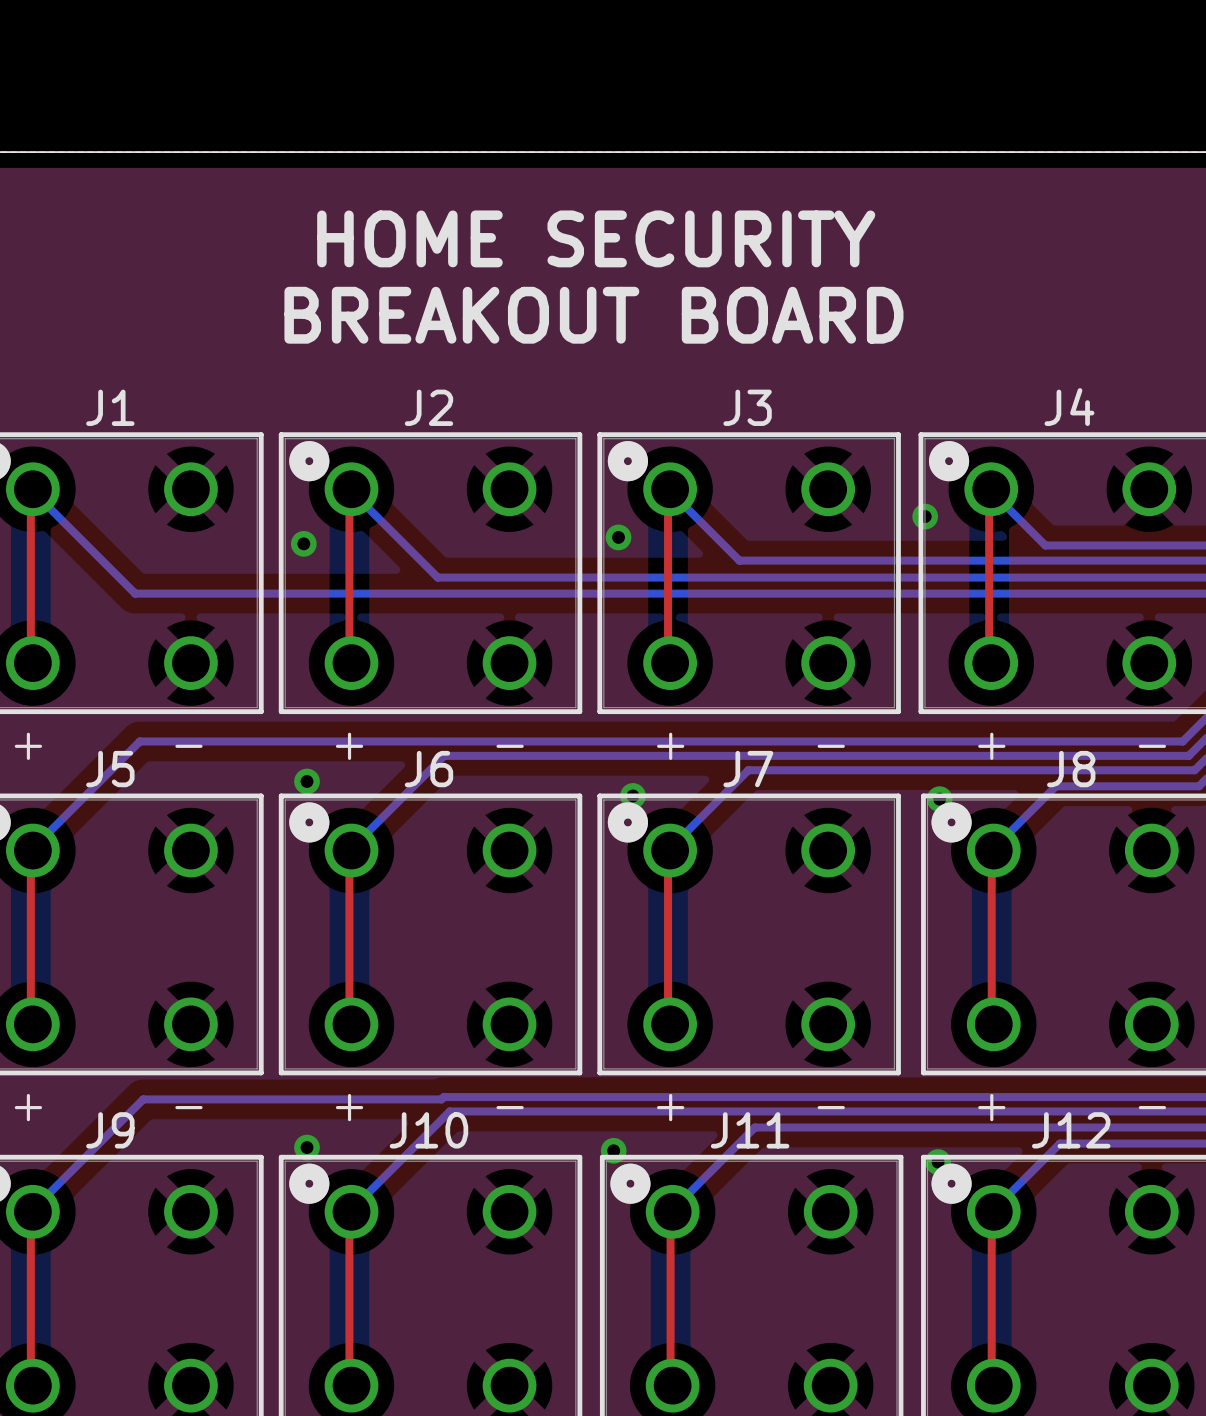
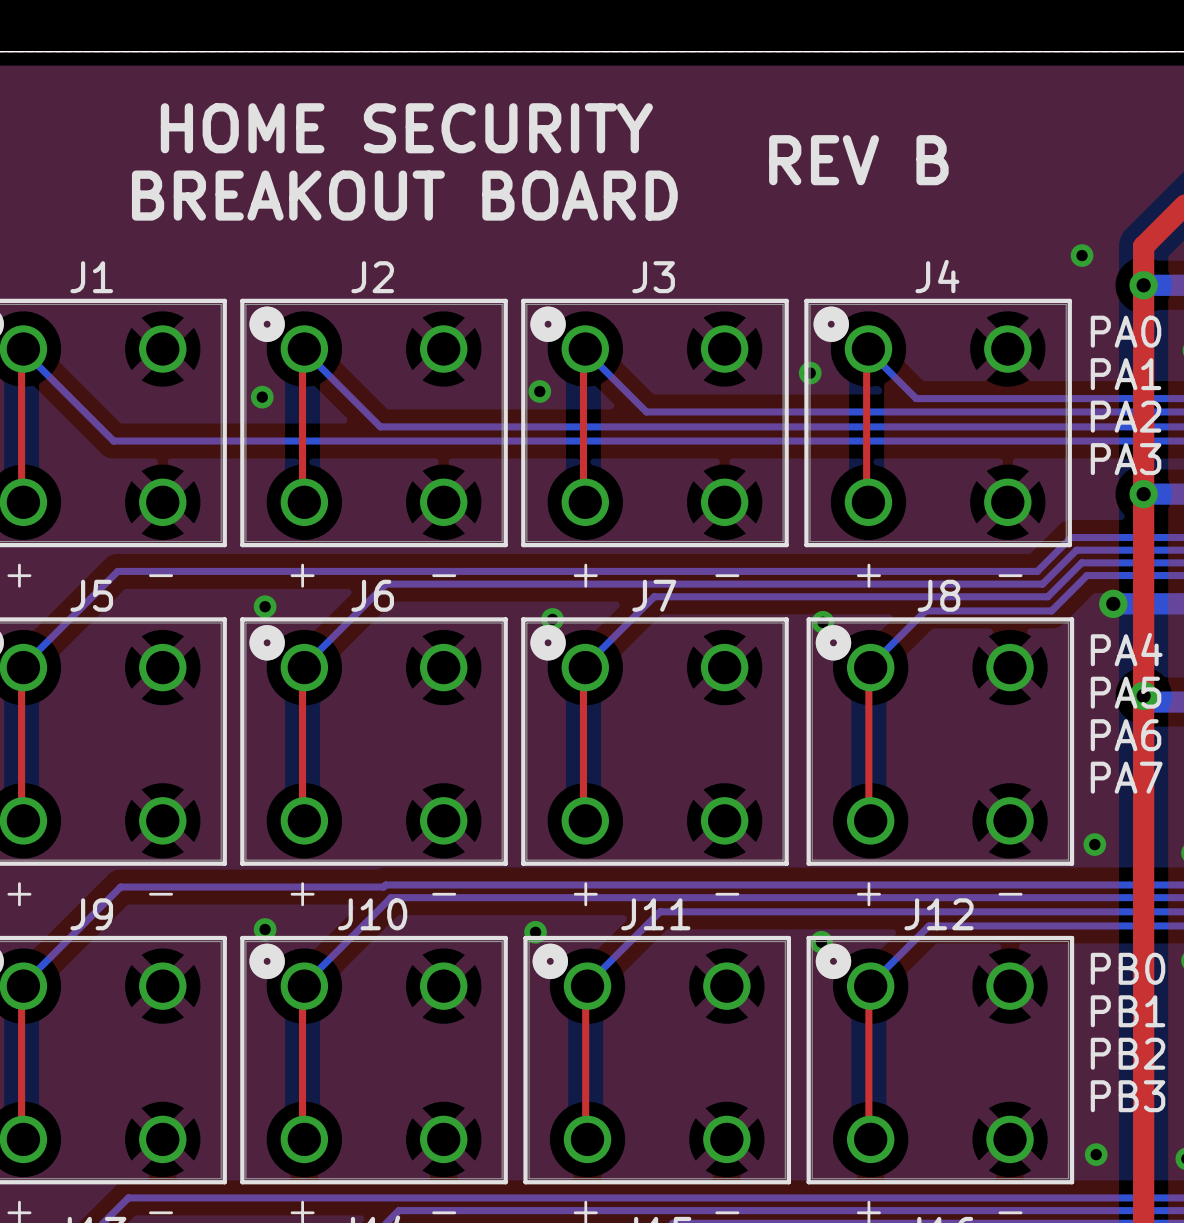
text position: HOME SECURITY (596, 238) -> HOME SECURITY (406, 128)
text: none -> REV B (858, 160)
text position: BREAKOUT BOARD (593, 315) -> BREAKOUT BOARD (404, 195)

